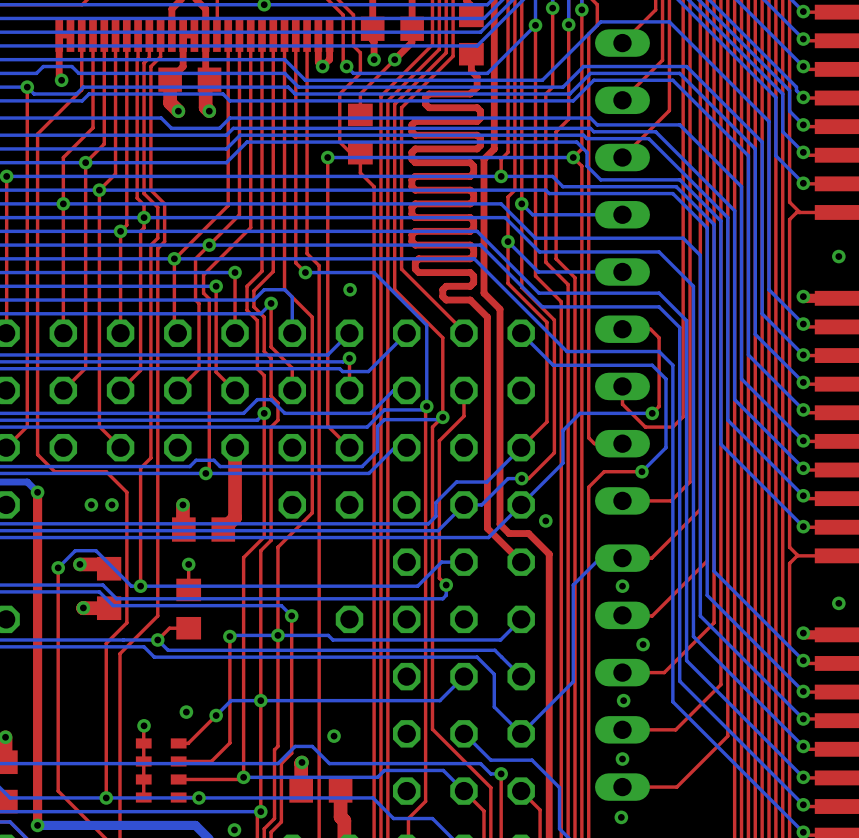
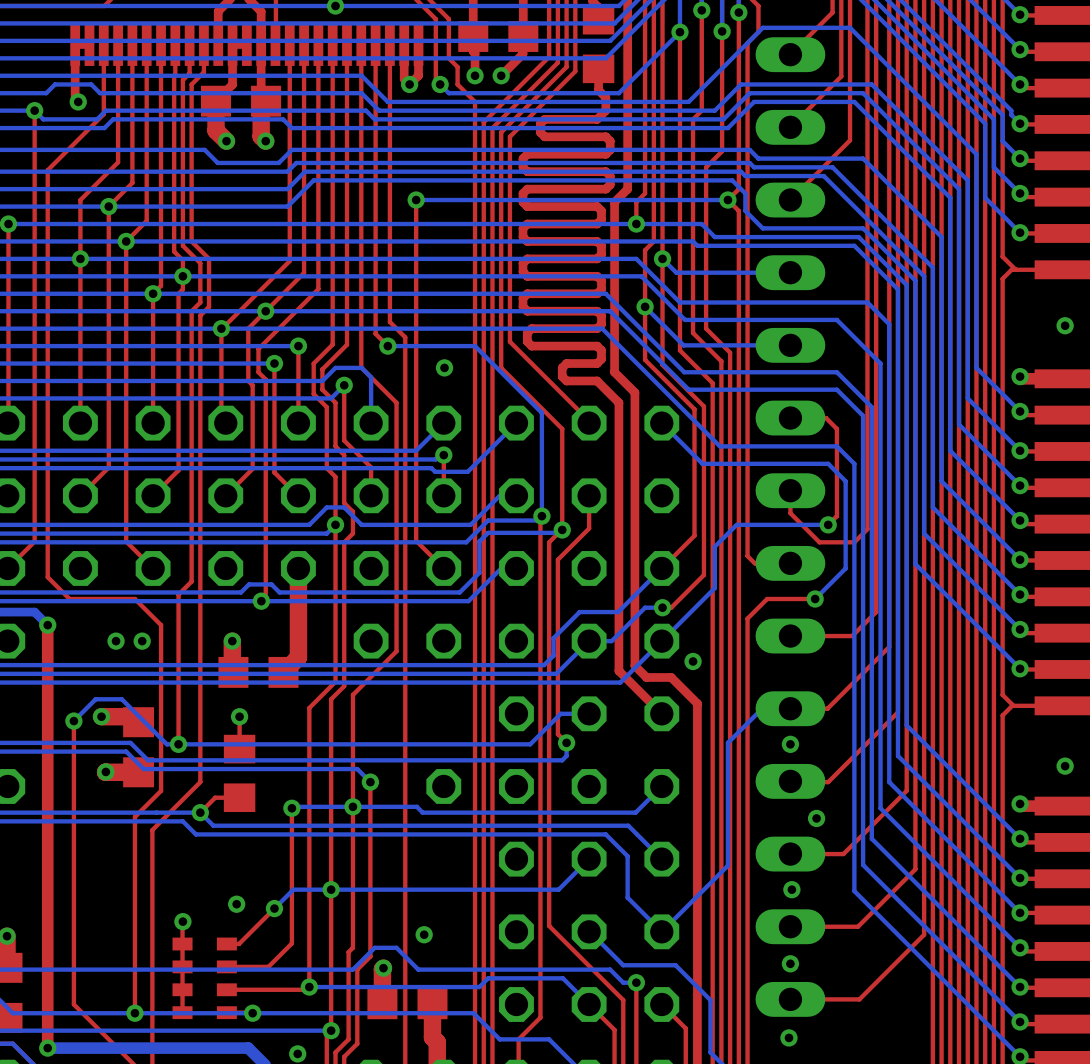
top track: (394, 59) (360, 94) (360, 114) -> none
top track: (360, 66) (360, 73) (339, 94) (339, 142) (350, 152) (360, 153) (360, 172) (374, 186) -> (457, 84) (475, 101) (475, 237)
part: (360, 134) -> none

